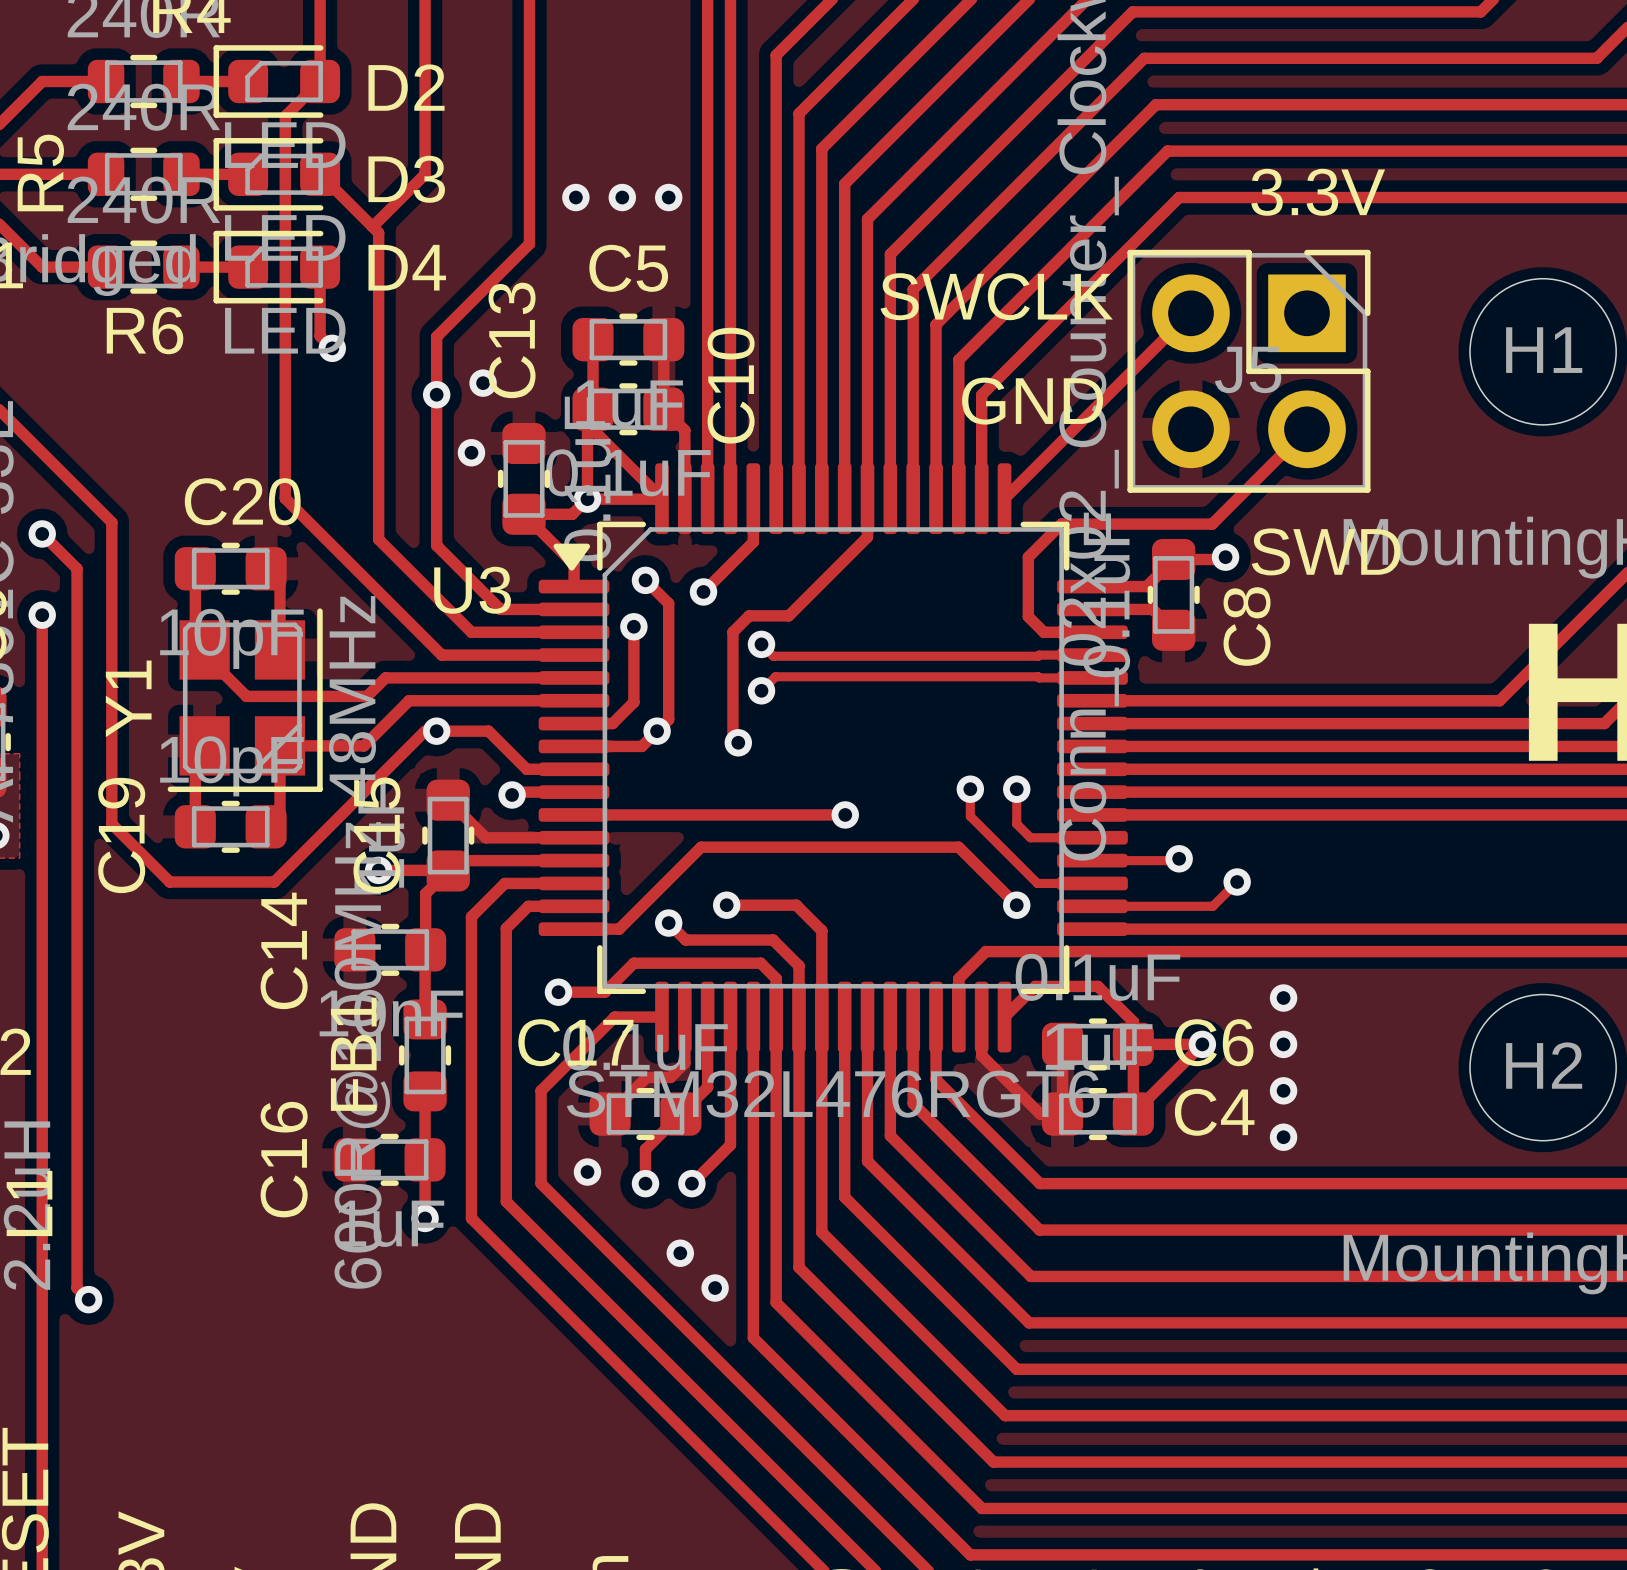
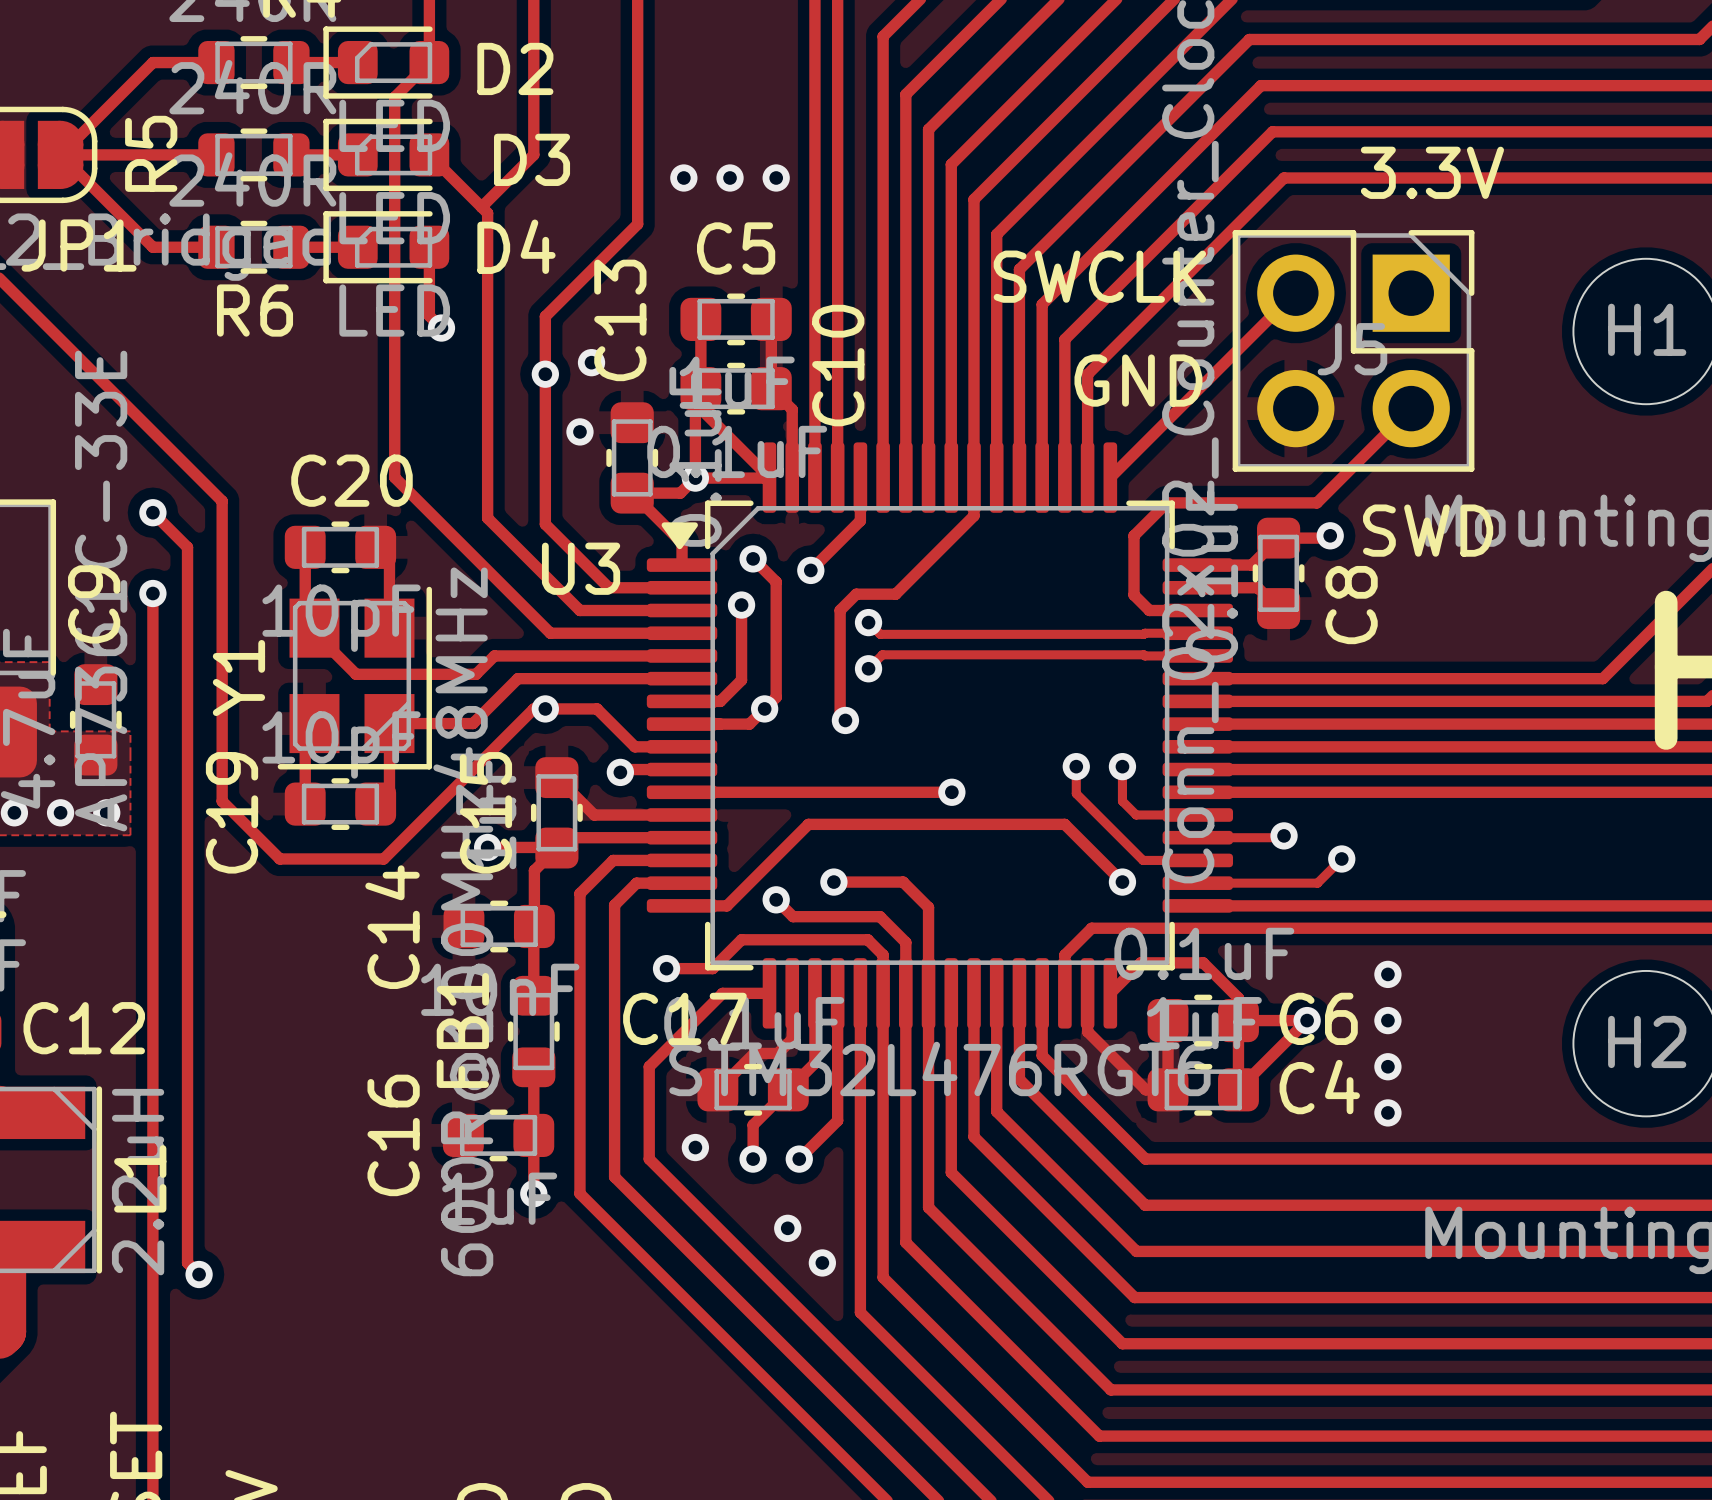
D3 name position: D3 (406, 179) -> D3 (532, 159)

